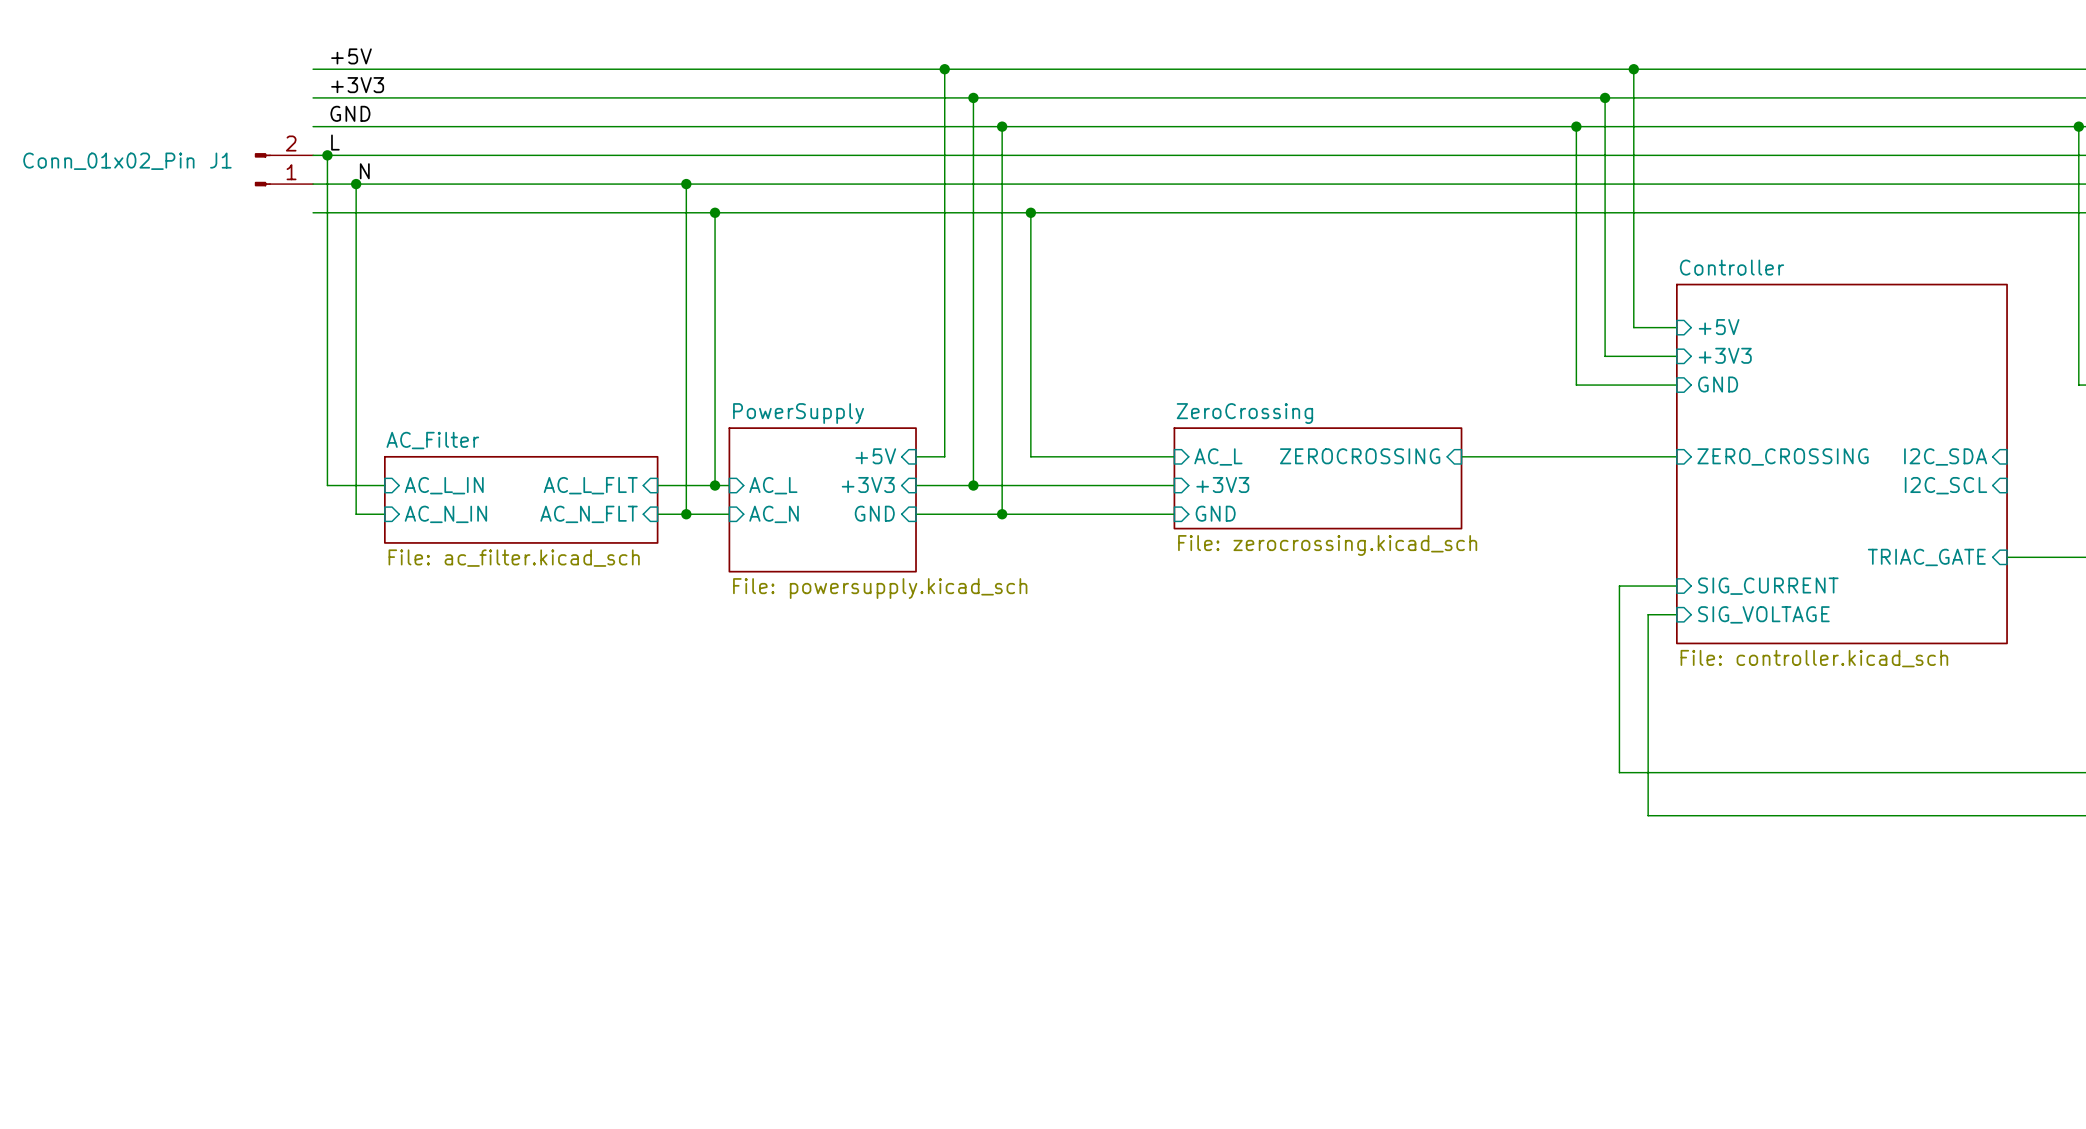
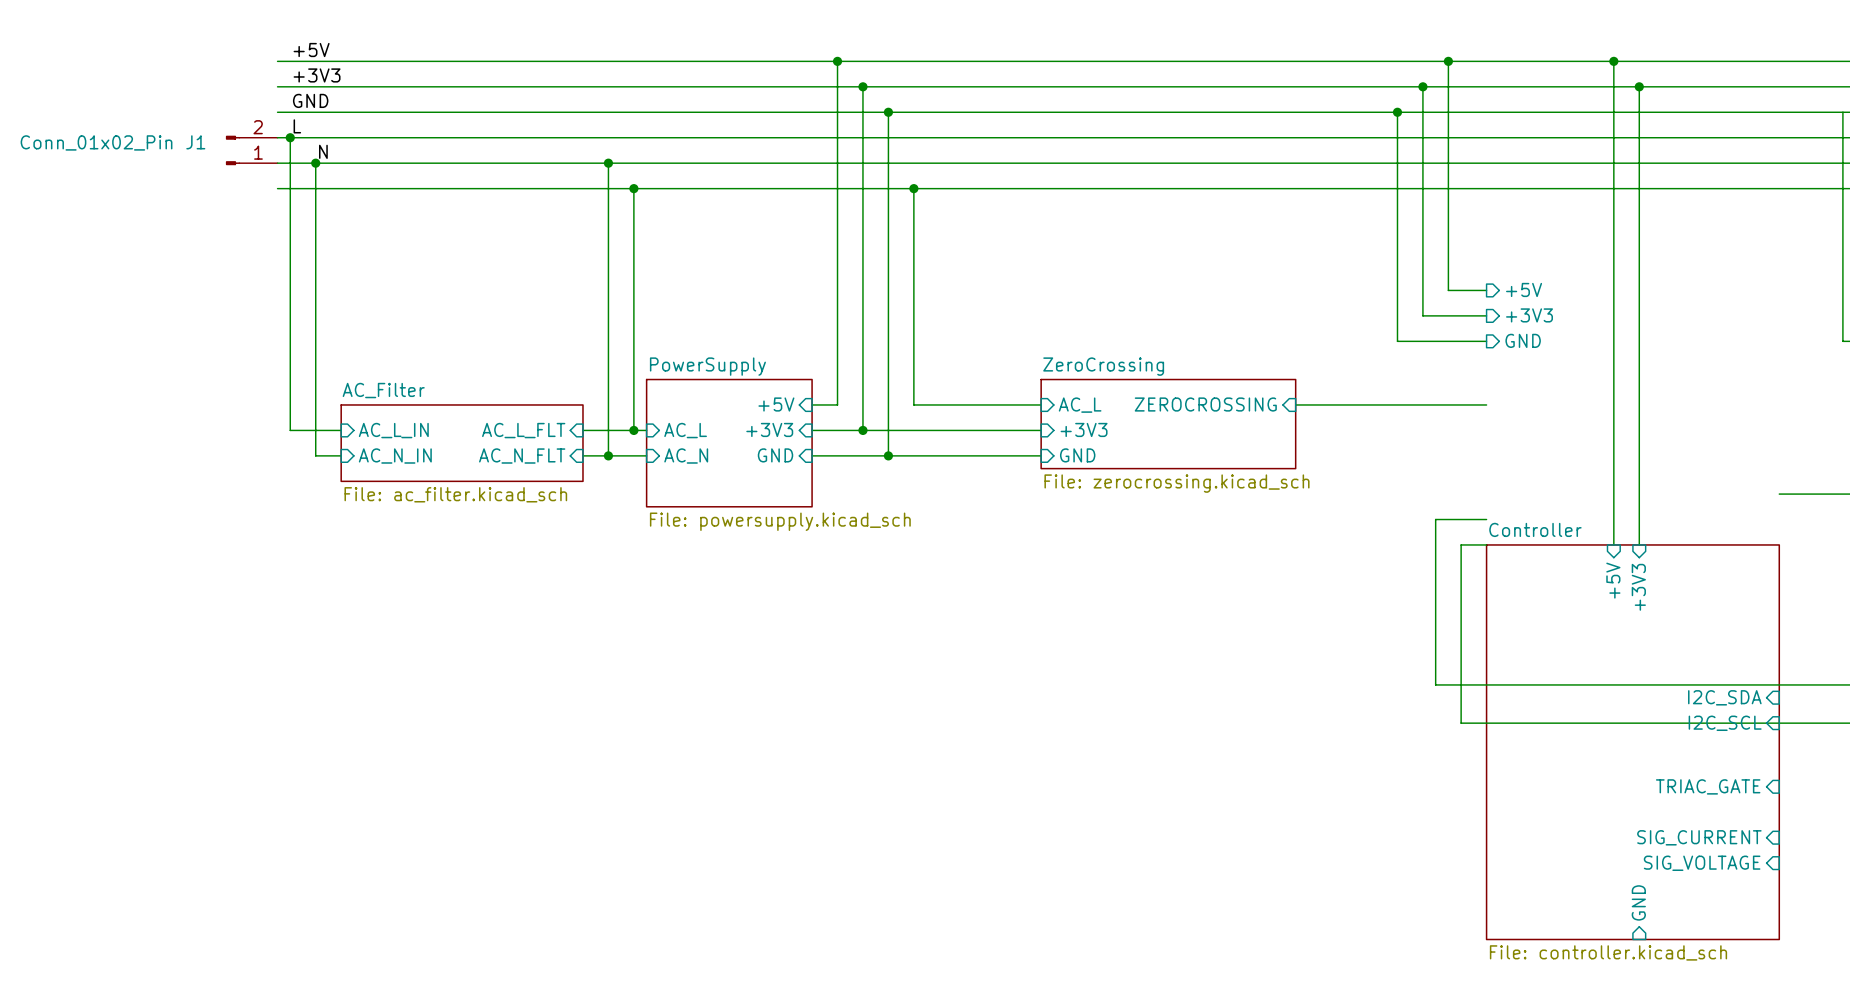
wire: none -> (1613, 61) (1613, 544)
junction: none -> (1613, 61)
wire: none -> (1639, 86) (1639, 544)
junction: none -> (1639, 86)
junction: (2078, 126) -> none
sheet pin: ZERO_CROSSING (1783, 456) -> none
sheet pin: I2C_SDA (1945, 456) -> none
sheet Controller: File: controller.kicad_sch (1841, 464) -> none
sheet pin: I2C_SCL (1945, 485) -> none
sheet pin: TRIAC_GATE (1926, 557) -> none
sheet pin: SIG_CURRENT (1768, 586) -> none
sheet pin: SIG_VOLTAGE (1763, 614) -> none
sheet pin: none -> +5V (1613, 580)
sheet pin: none -> +3V3 (1638, 587)
sheet pin: none -> I2C_SDA (1724, 697)
sheet pin: none -> I2C_SCL (1725, 723)
sheet Controller: none -> File: controller.kicad_sch (1632, 742)
sheet pin: none -> TRIAC_GATE (1708, 786)
sheet pin: none -> SIG_CURRENT (1699, 837)
sheet pin: none -> SIG_VOLTAGE (1702, 863)
sheet pin: none -> GND (1638, 902)

